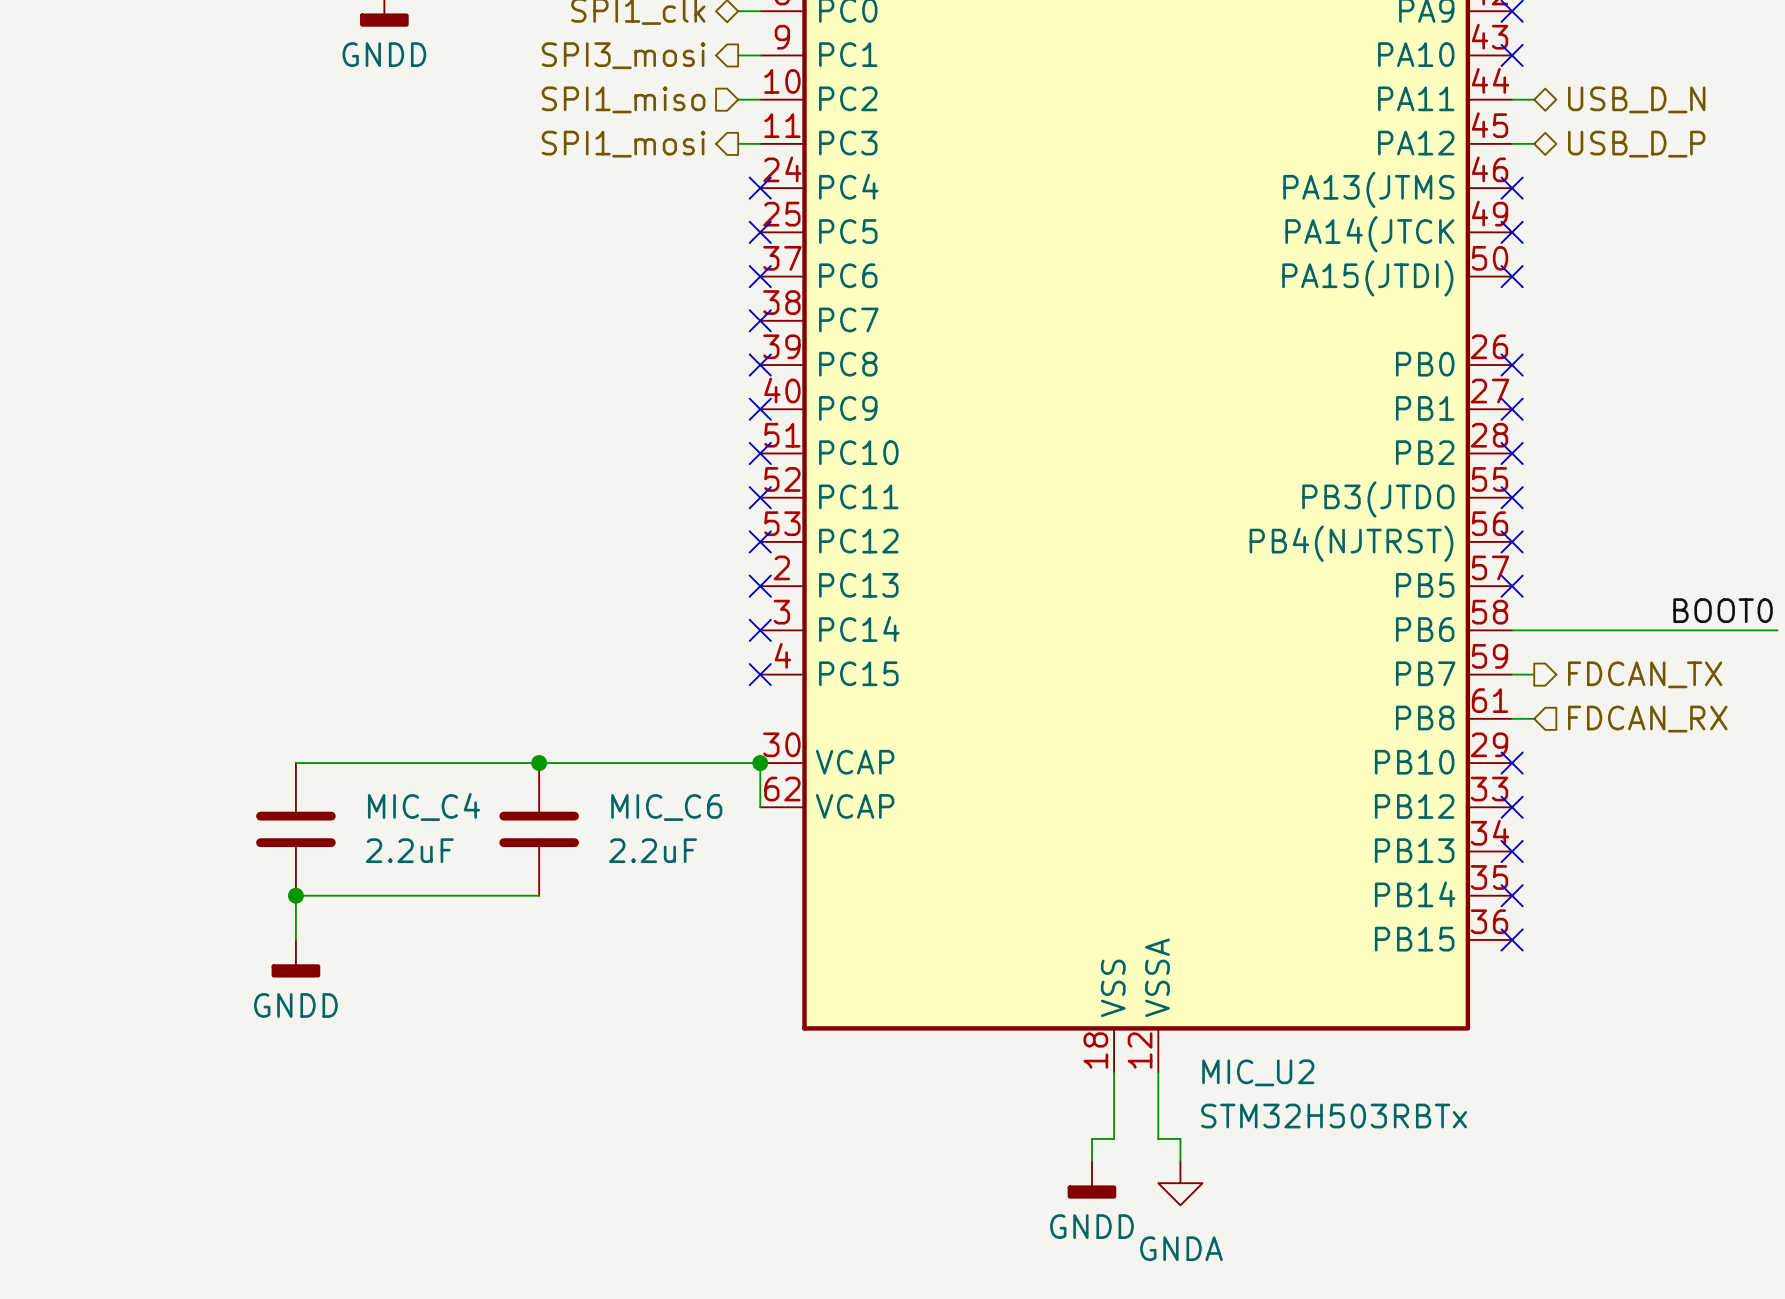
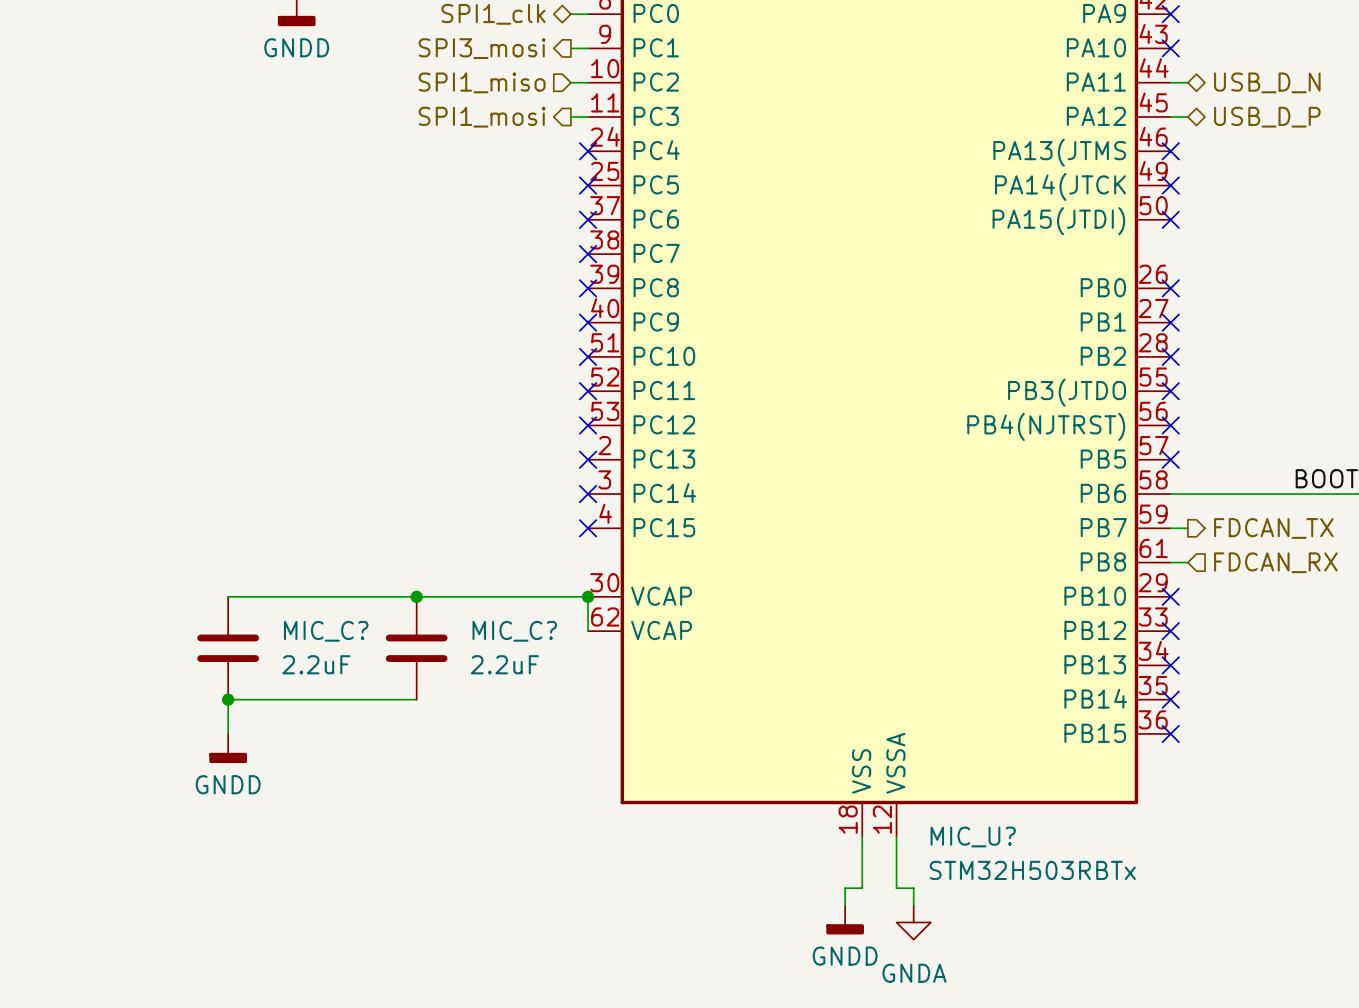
MIC_C4 name: MIC_C4 (424, 806) -> MIC_C? (326, 631)
MIC_C6 name: MIC_C6 (666, 807) -> MIC_C? (514, 631)
MIC_U2 name: MIC_U2 (1258, 1072) -> MIC_U? (973, 836)

